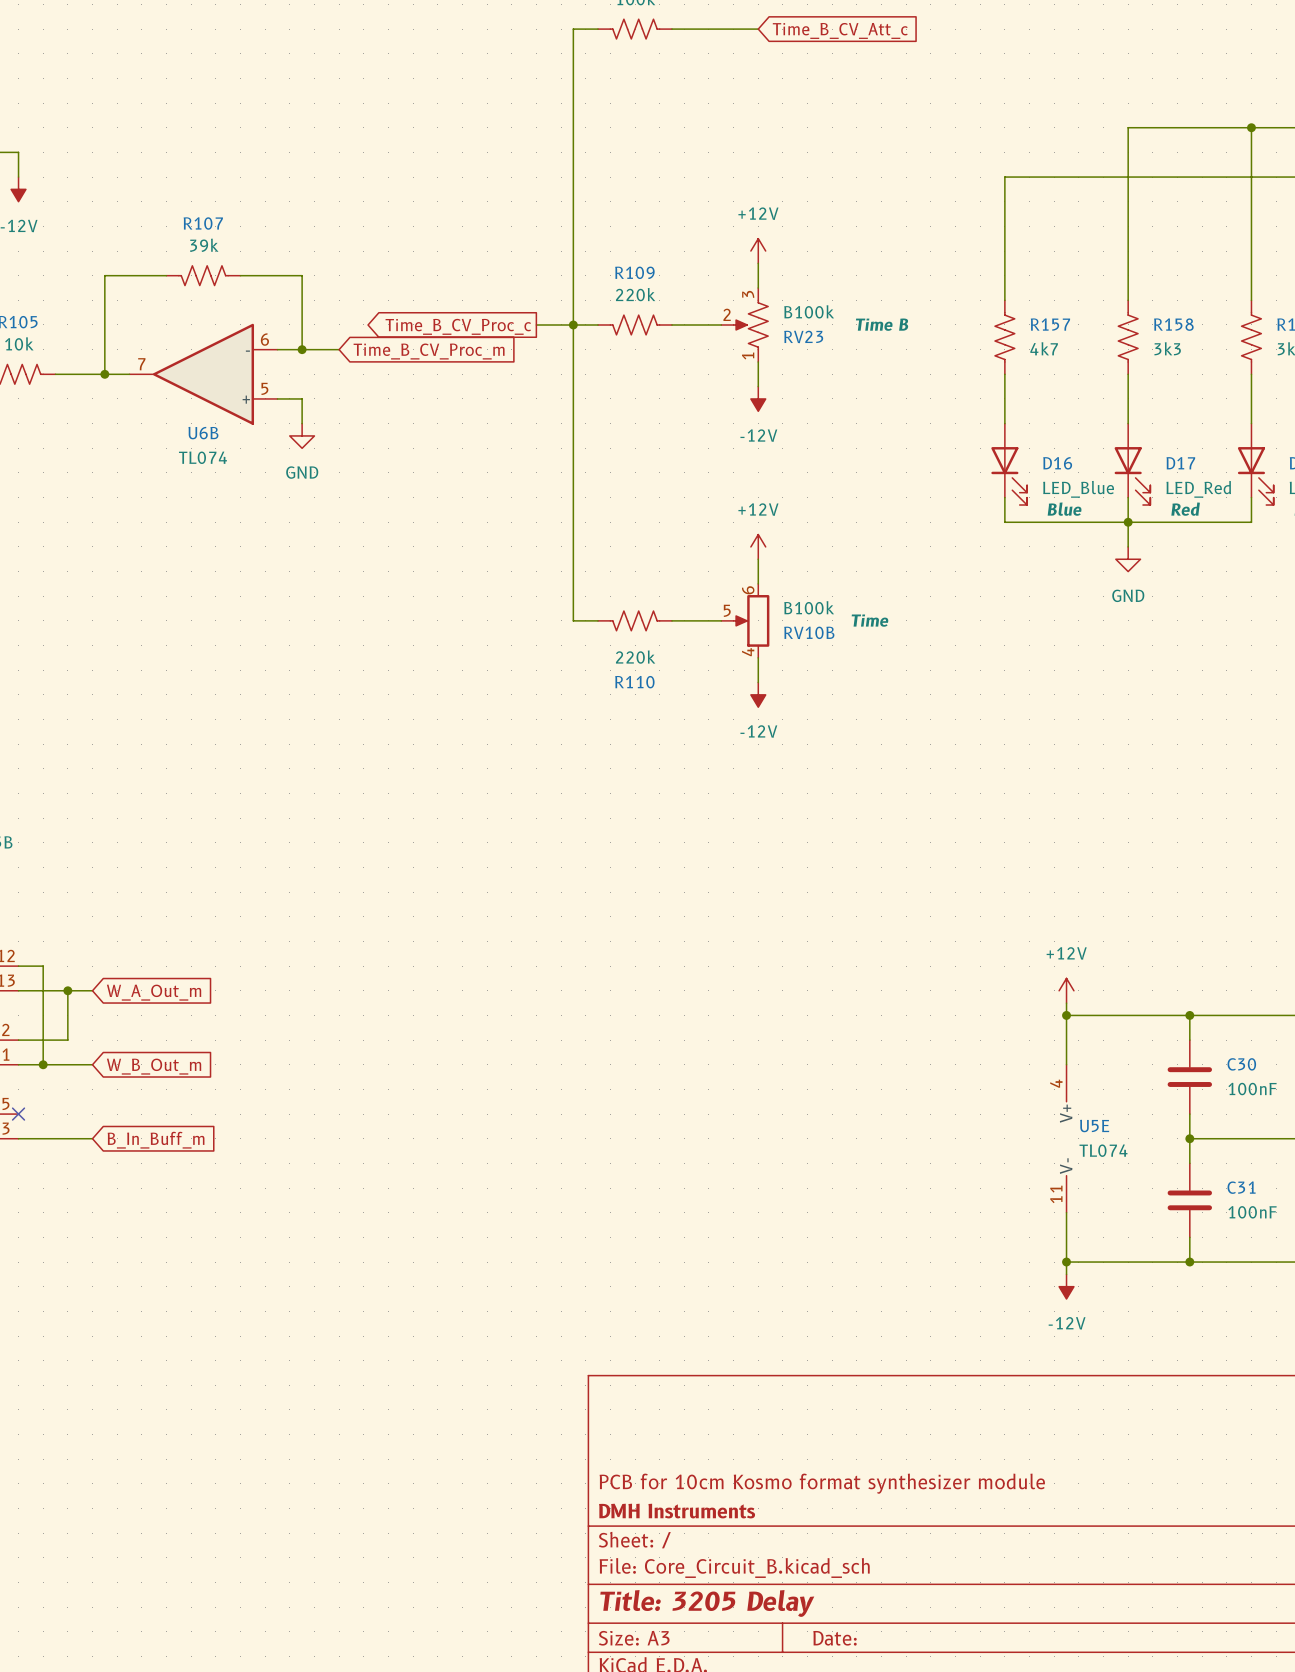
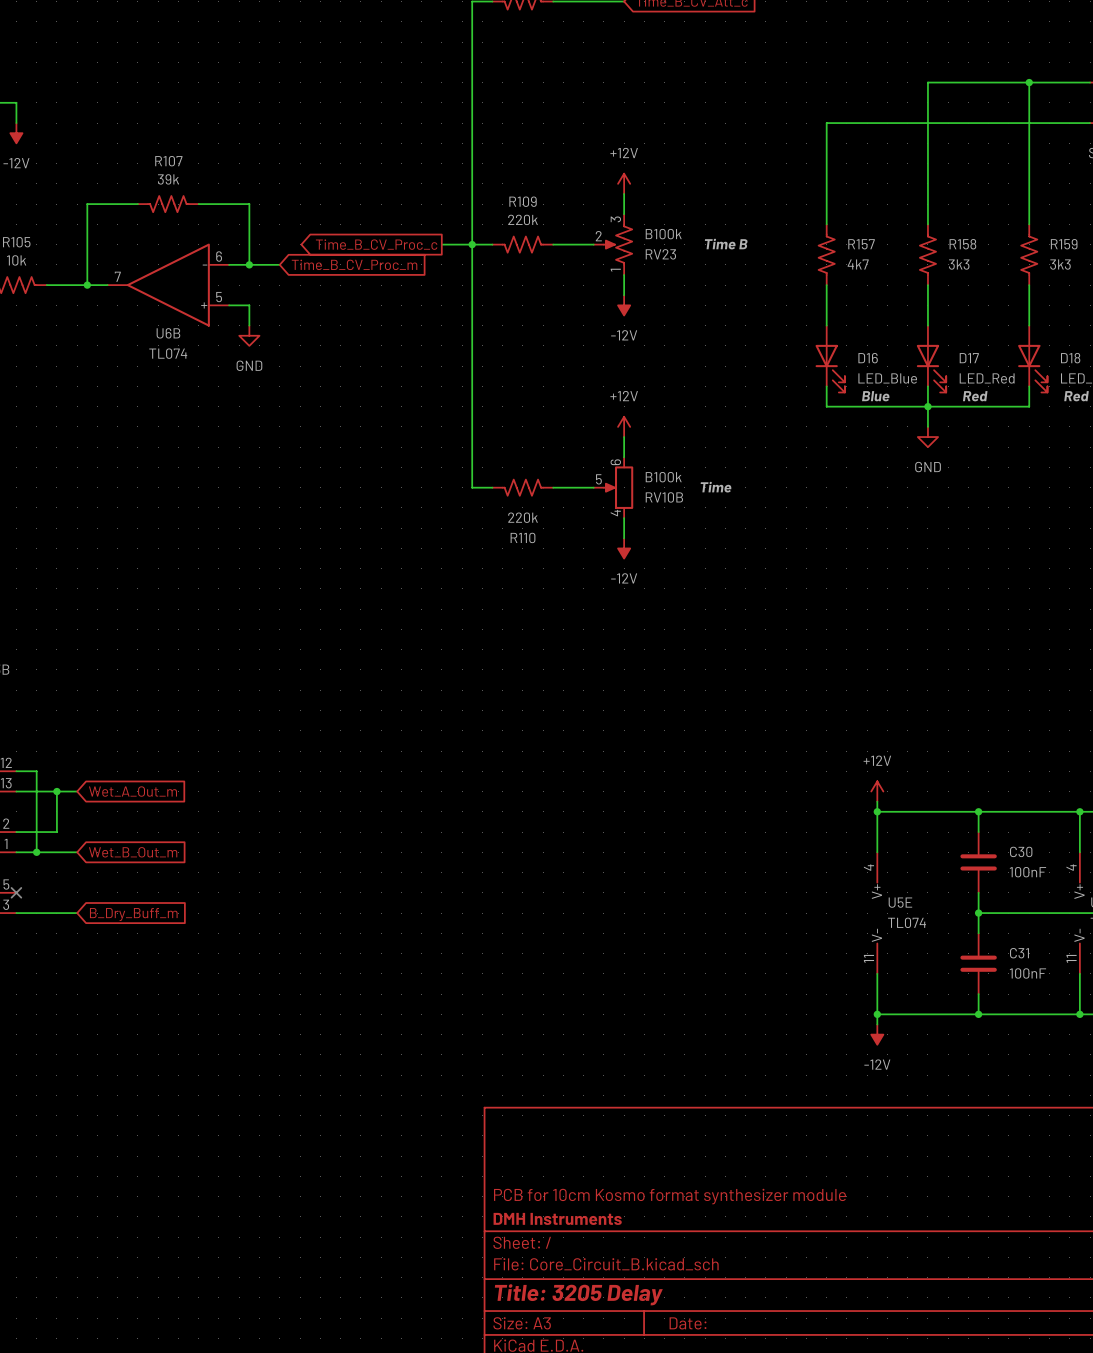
global label: W_A_Out_m (154, 992) -> Wet_A_Out_m (132, 791)
global label: W_B_Out_m (154, 1066) -> Wet_B_Out_m (133, 852)
global label: B_In_Buff_m (156, 1140) -> B_Dry_Buff_m (133, 914)

